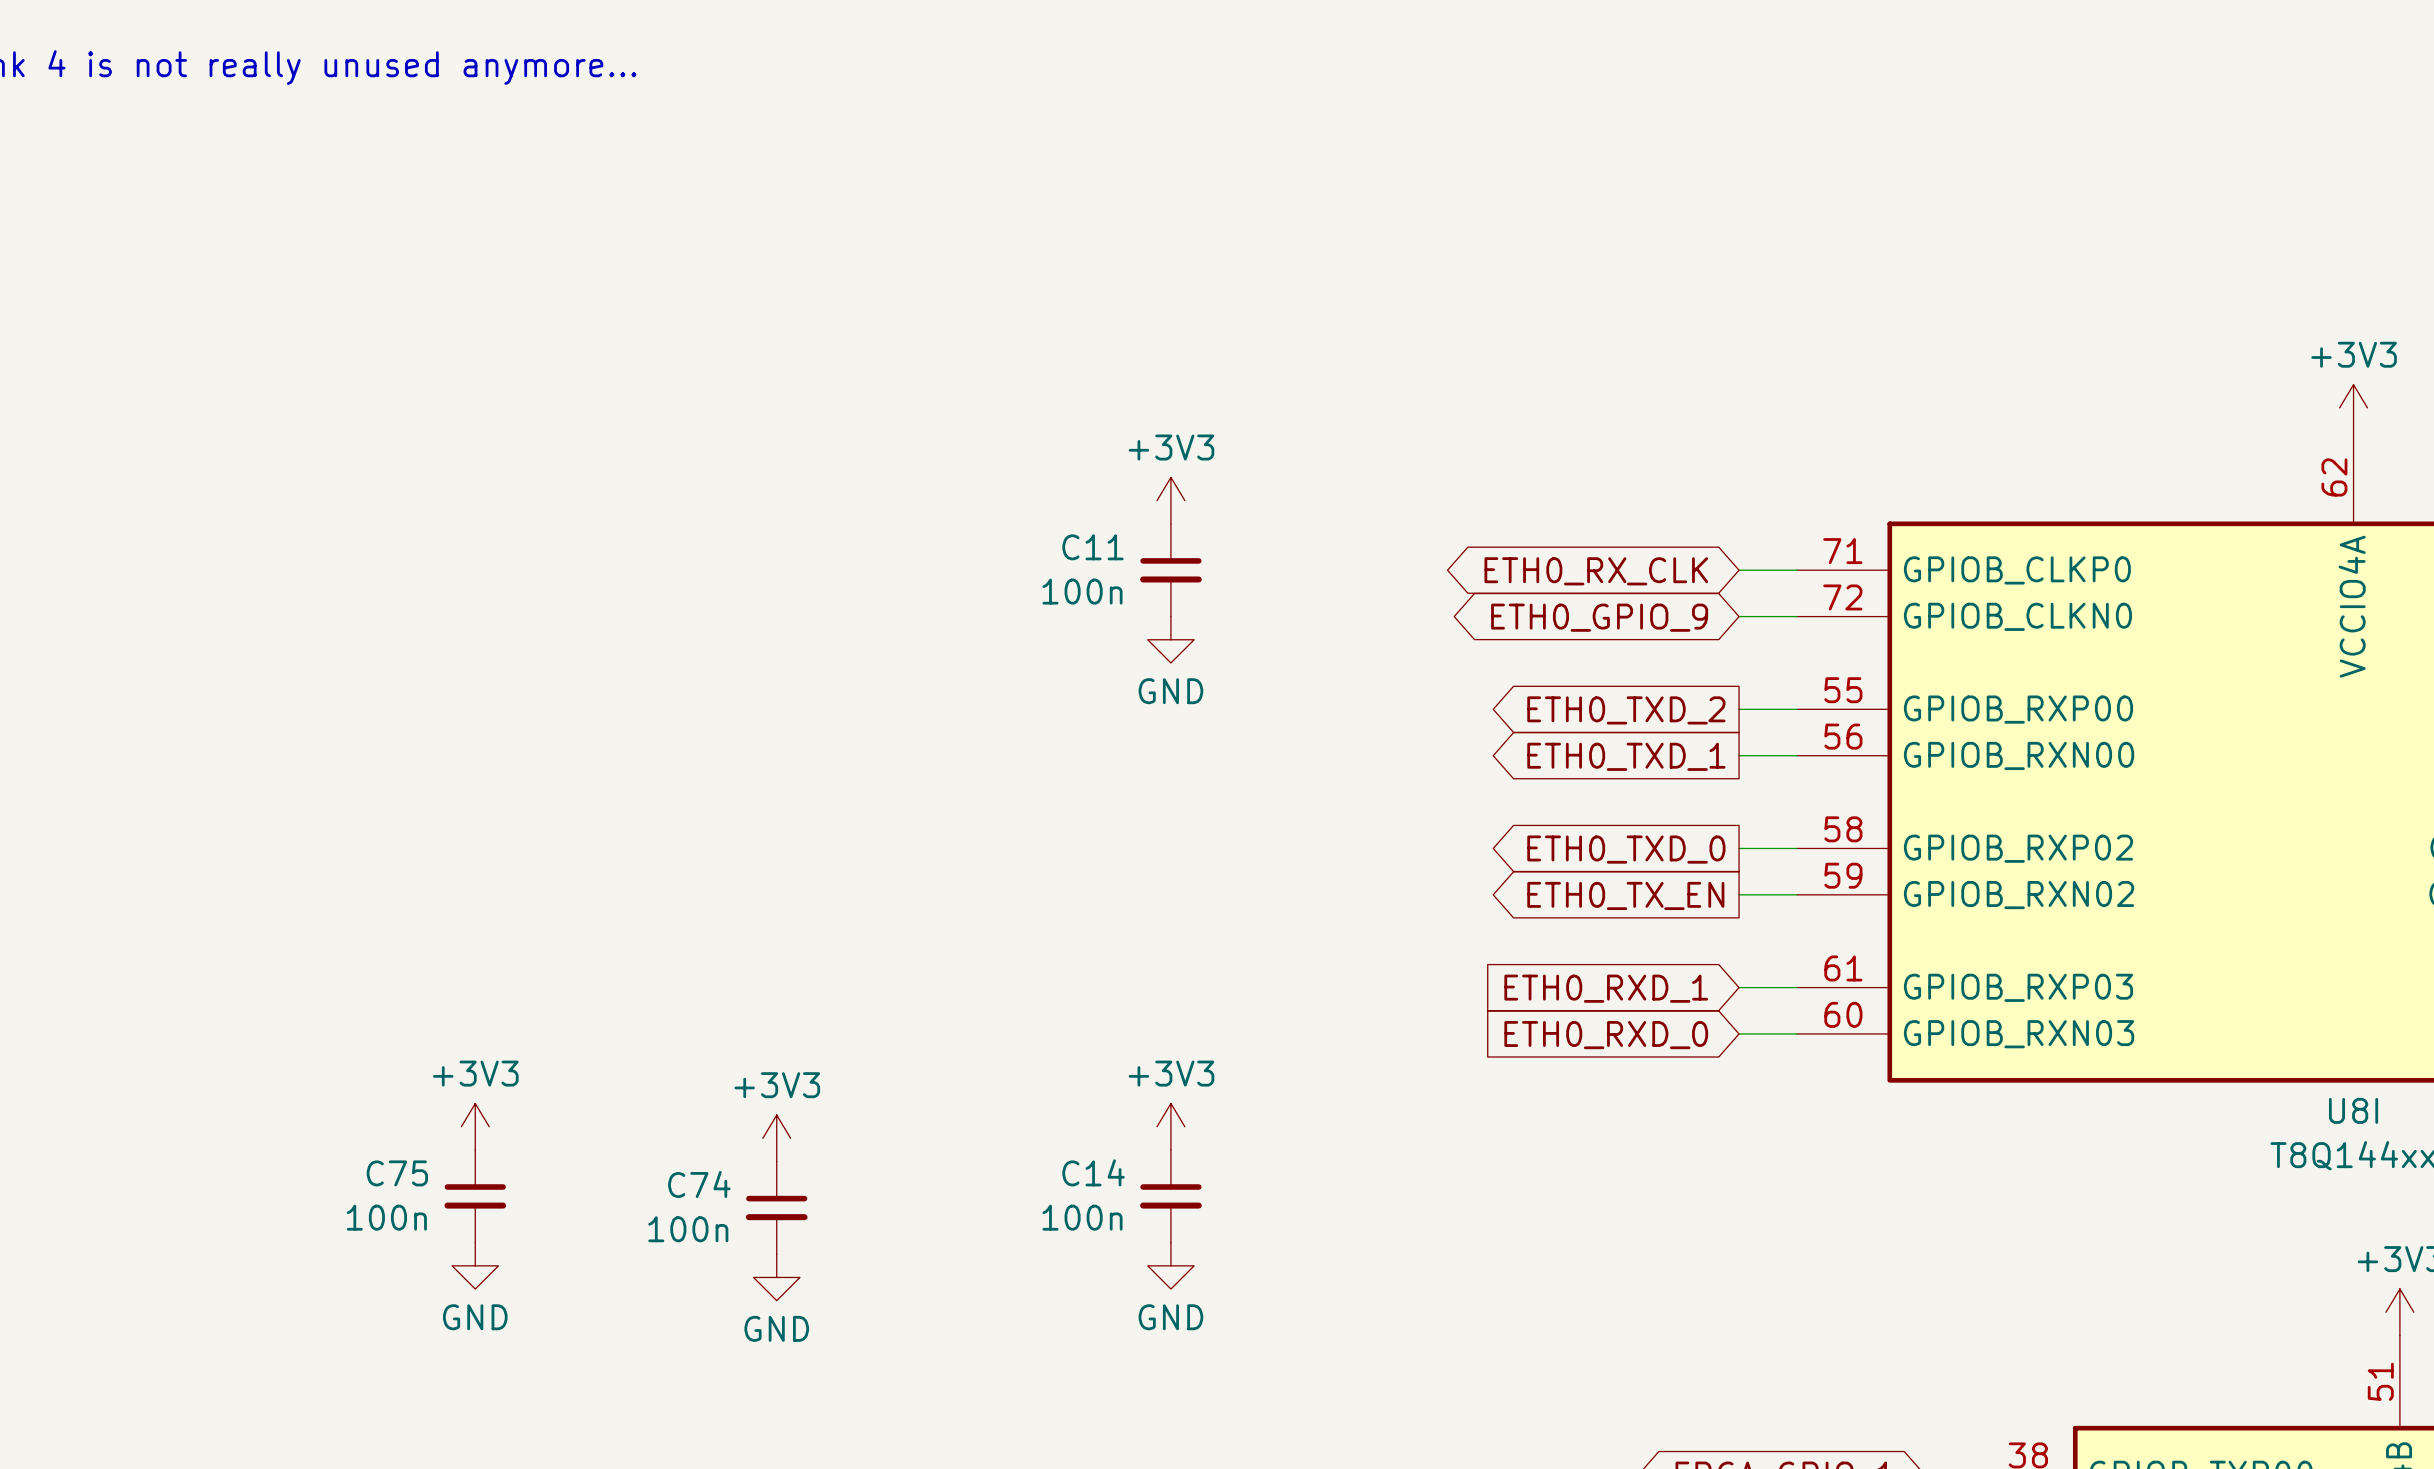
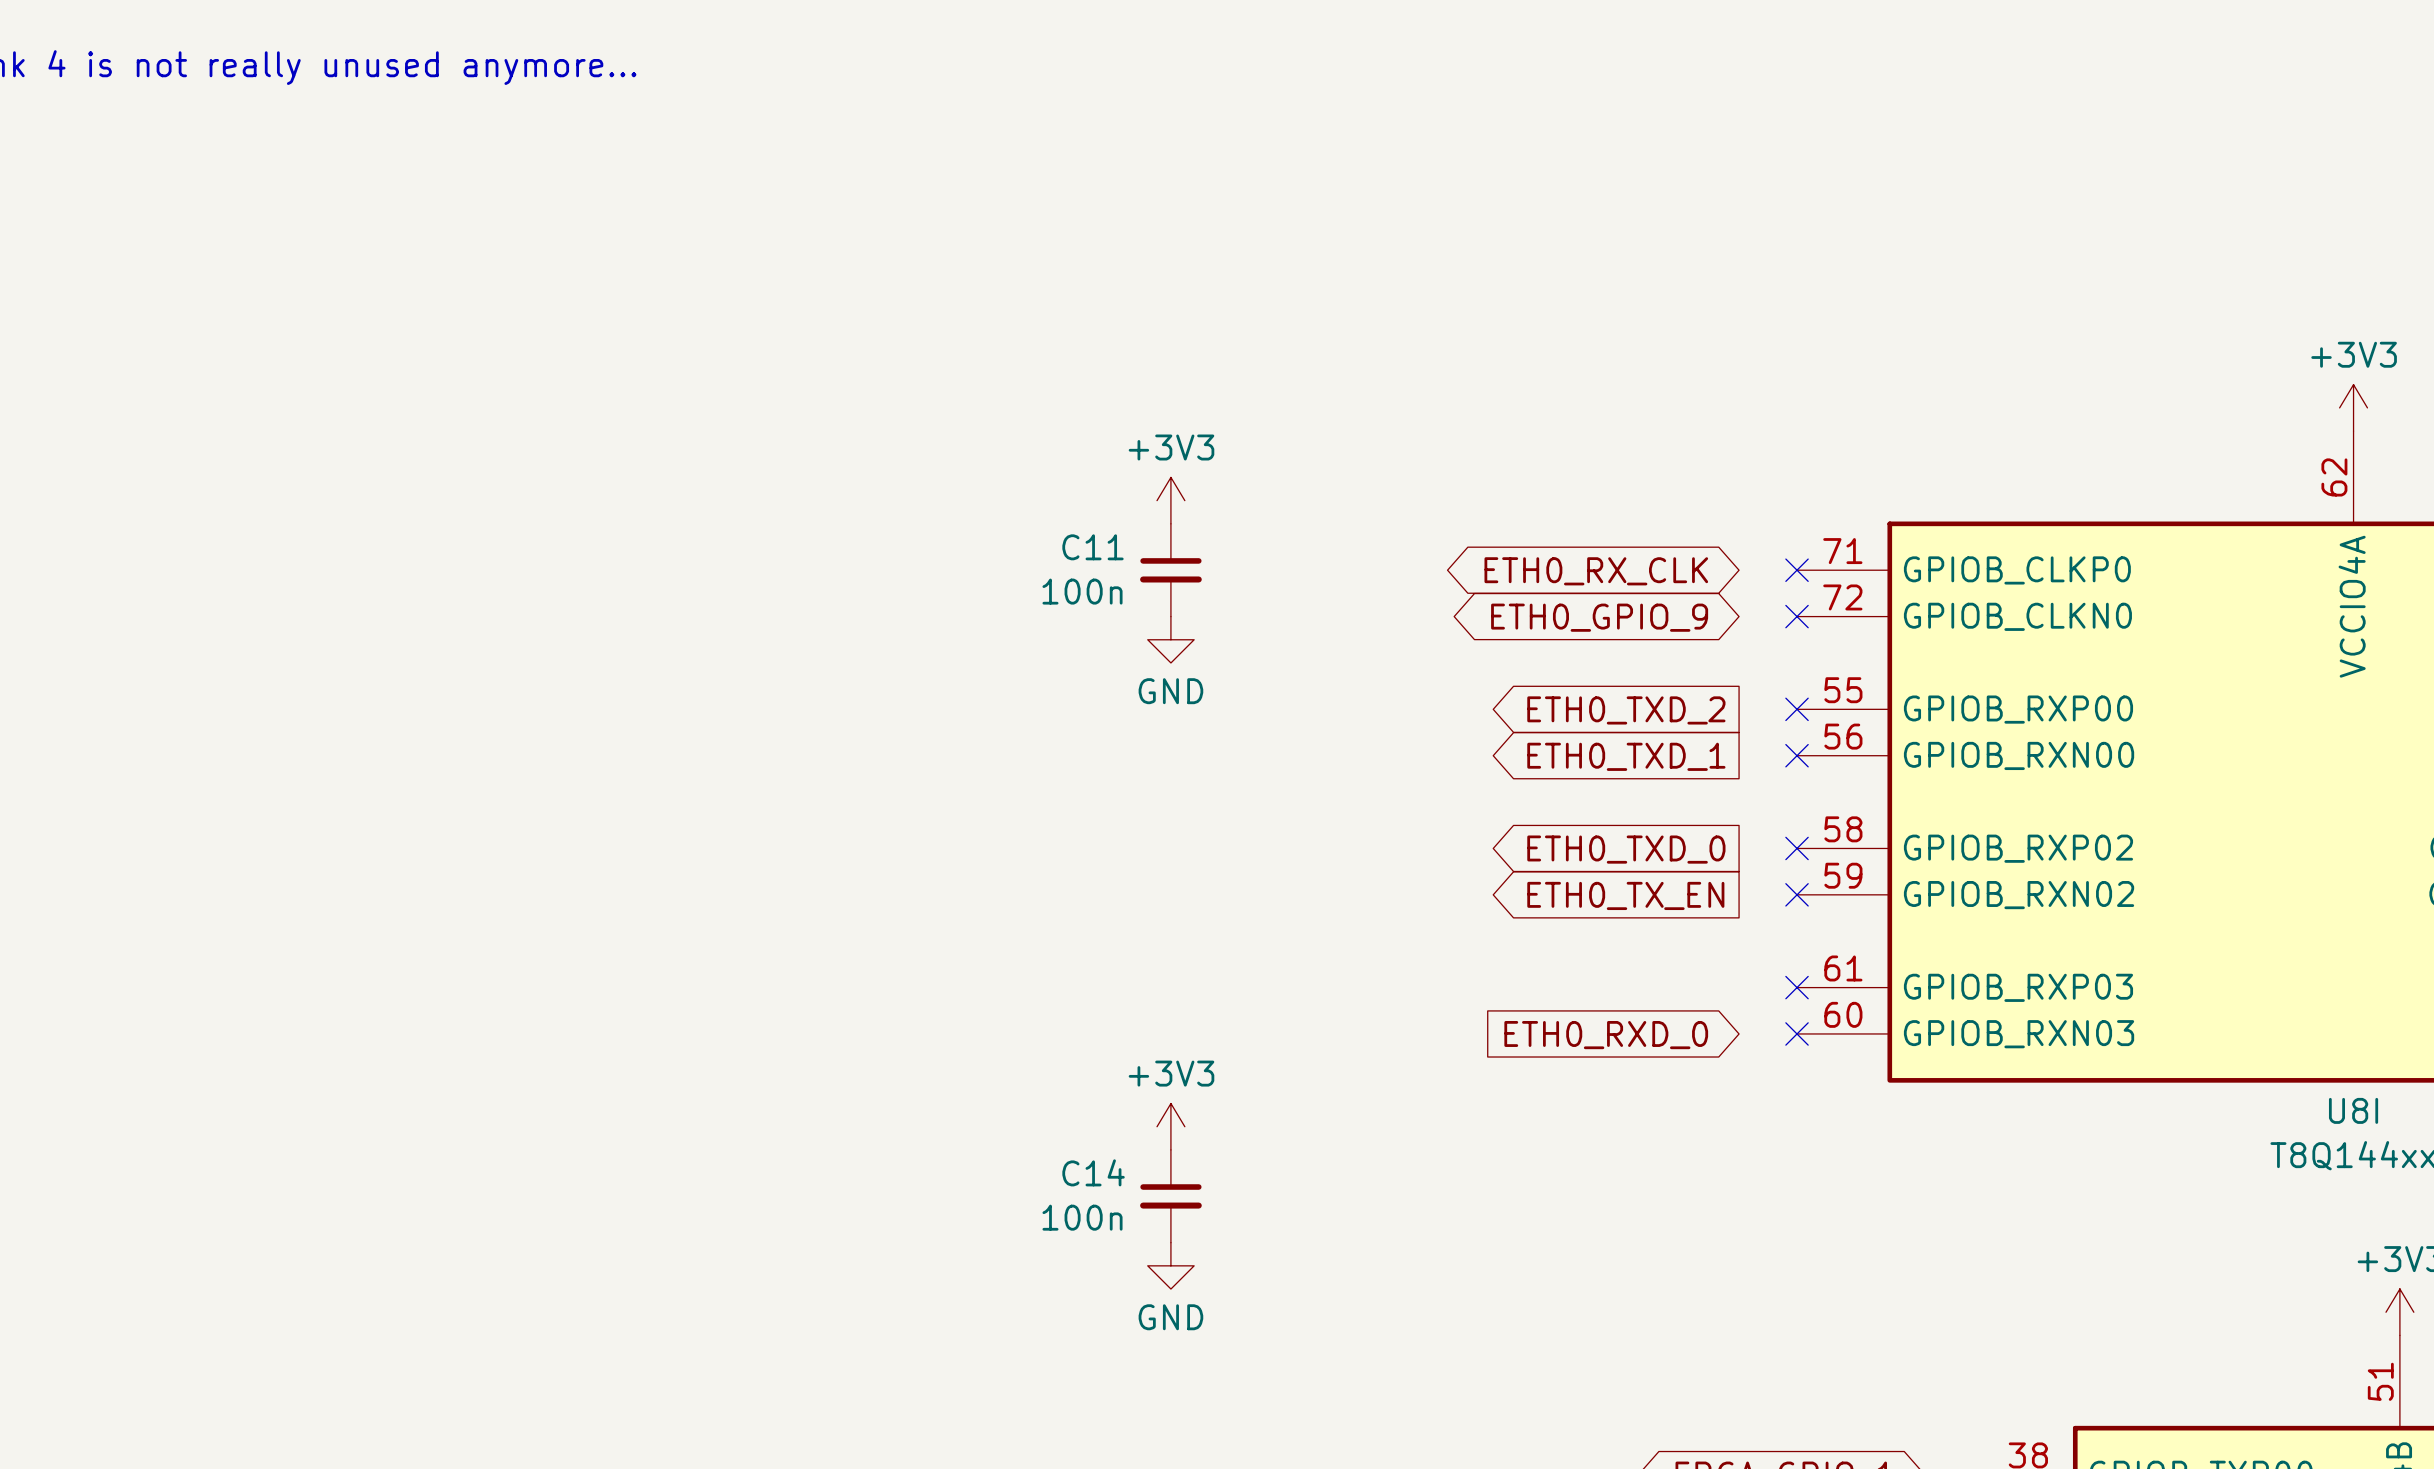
wire: (1739, 570) (1797, 570) -> none
no-connect mark: none -> (1797, 570)
wire: (1739, 616) (1797, 616) -> none
no-connect mark: none -> (1797, 616)
wire: (1739, 709) (1797, 709) -> none
no-connect mark: none -> (1797, 709)
wire: (1739, 755) (1797, 755) -> none
no-connect mark: none -> (1797, 755)
wire: (1739, 848) (1797, 848) -> none
no-connect mark: none -> (1797, 848)
wire: (1739, 894) (1797, 894) -> none
no-connect mark: none -> (1797, 894)
wire: (1739, 987) (1797, 987) -> none
no-connect mark: none -> (1797, 987)
global label: ETH0_RXD_1 (1606, 988) -> none
wire: (1739, 1033) (1797, 1033) -> none
no-connect mark: none -> (1797, 1033)
power symbol: +3V3 (475, 1126) -> none
power symbol: +3V3 (776, 1138) -> none
C75: 100n (475, 1196) -> none
C74: 100n (776, 1207) -> none
power symbol: GND (475, 1265) -> none
power symbol: GND (776, 1277) -> none

